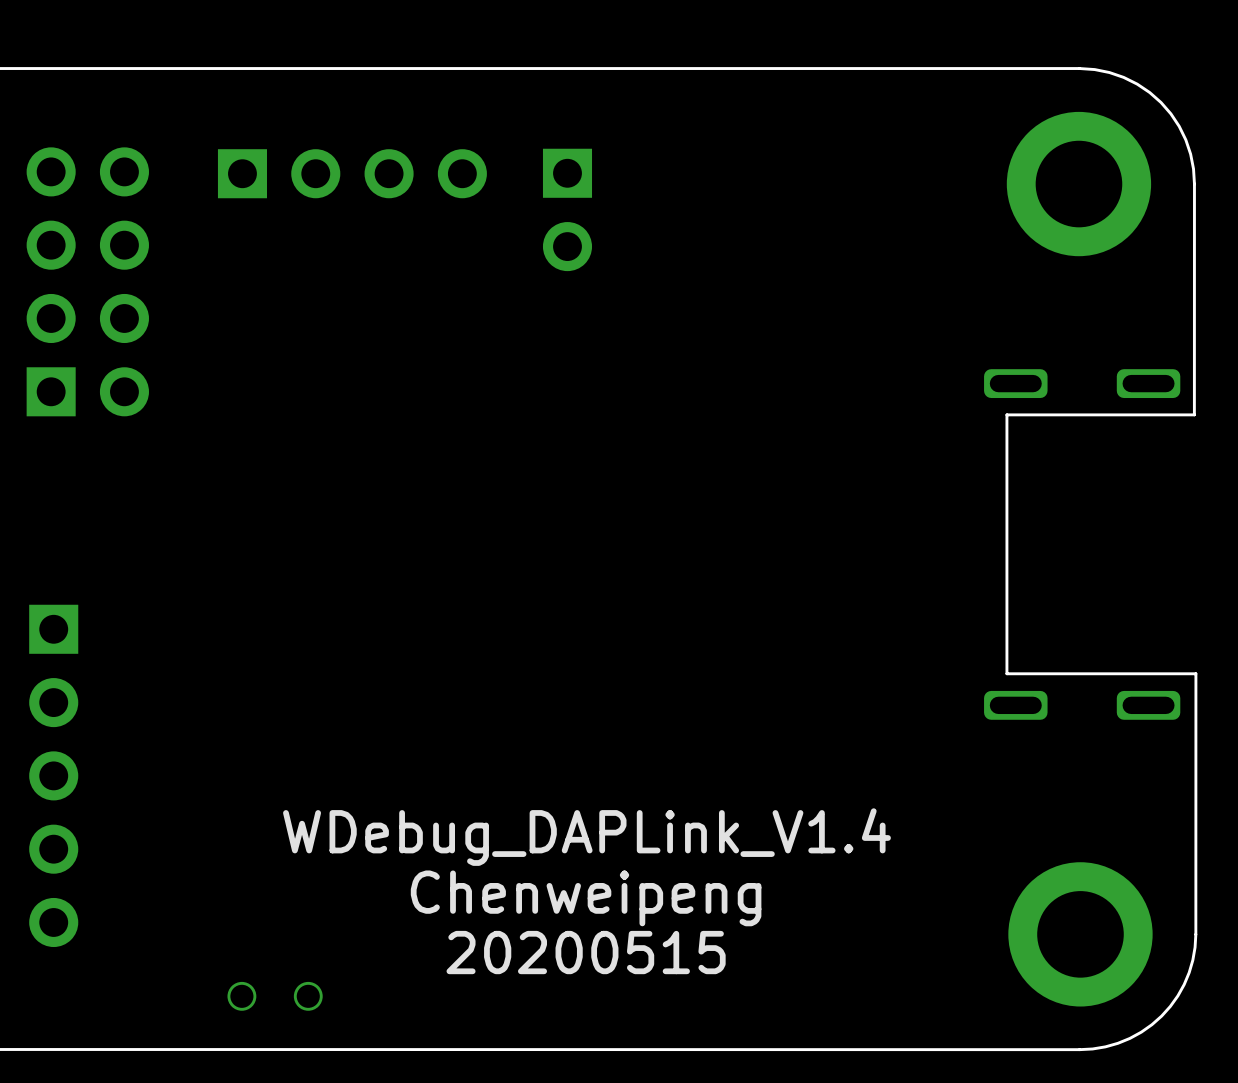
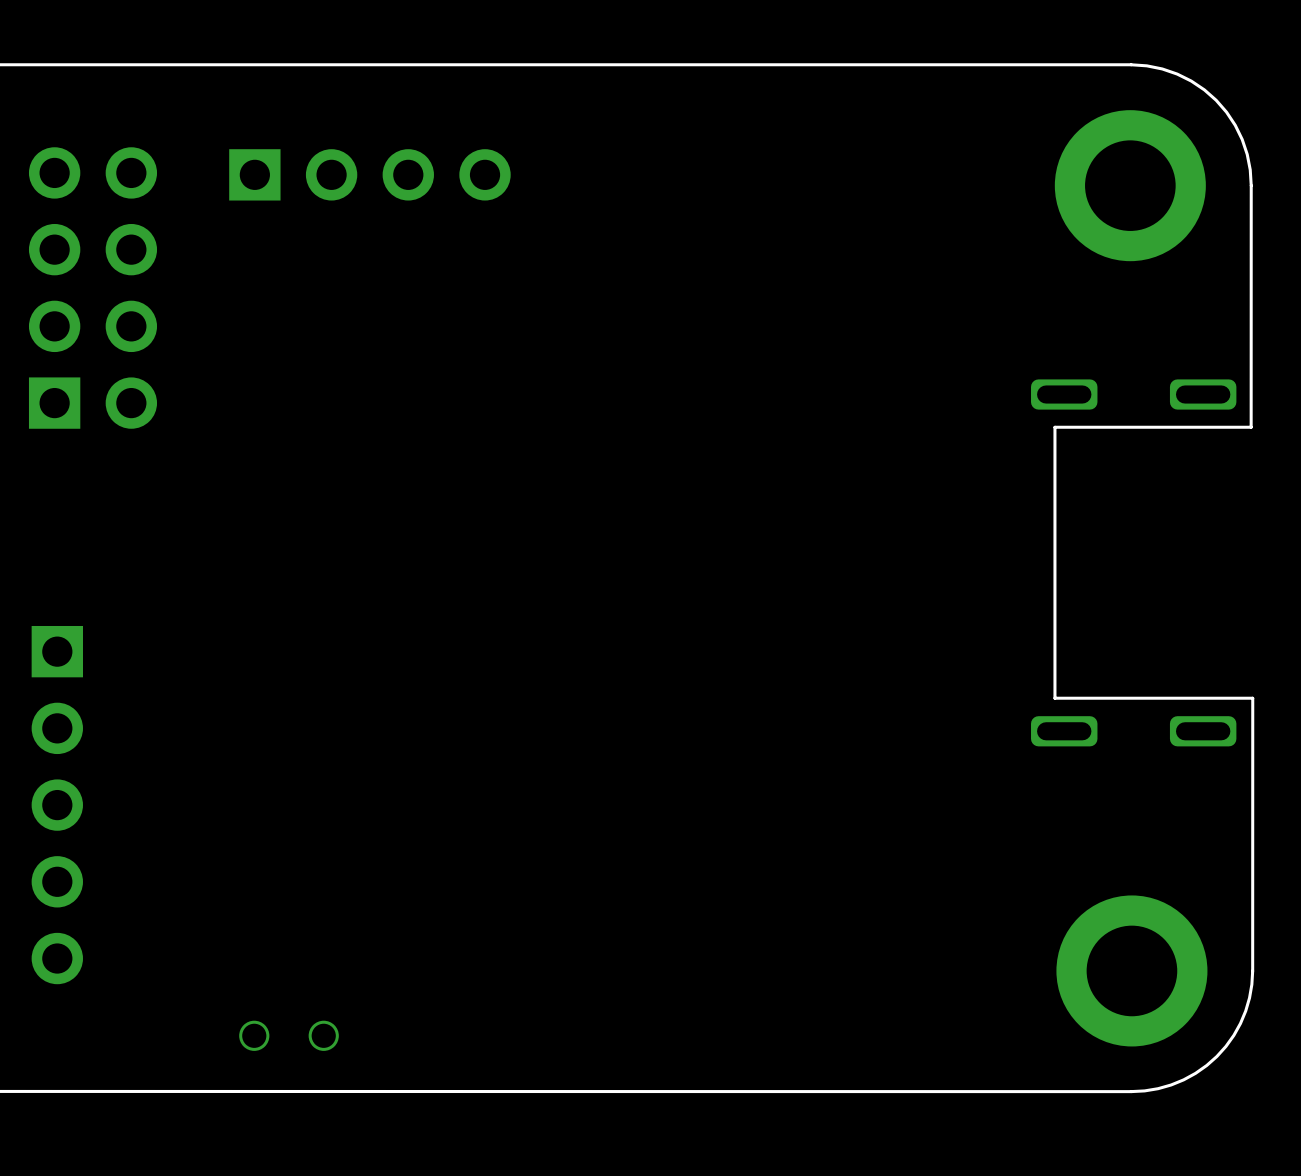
part: (567, 209) -> none
text: WDebug_DAPLink_V1.4 (586, 837) -> none
text: Chenweipeng (586, 898) -> none
text: 20200515 (586, 952) -> none

